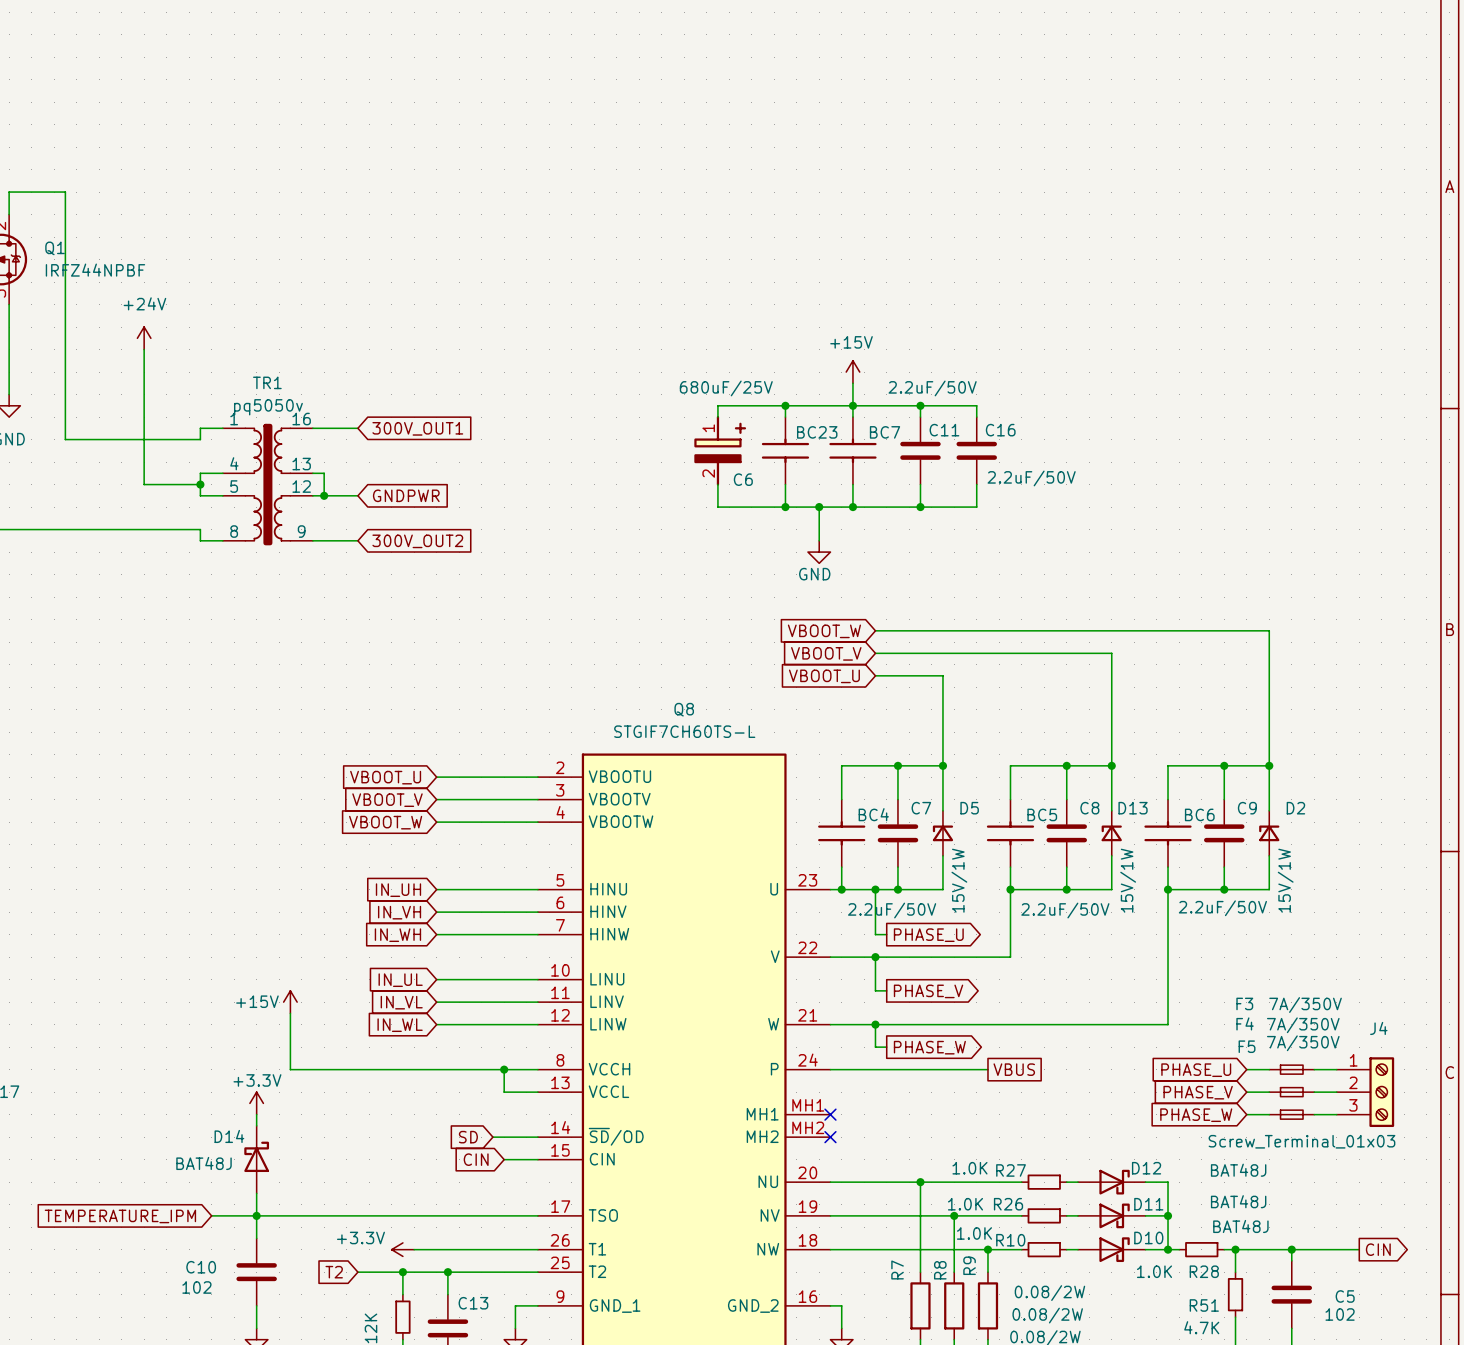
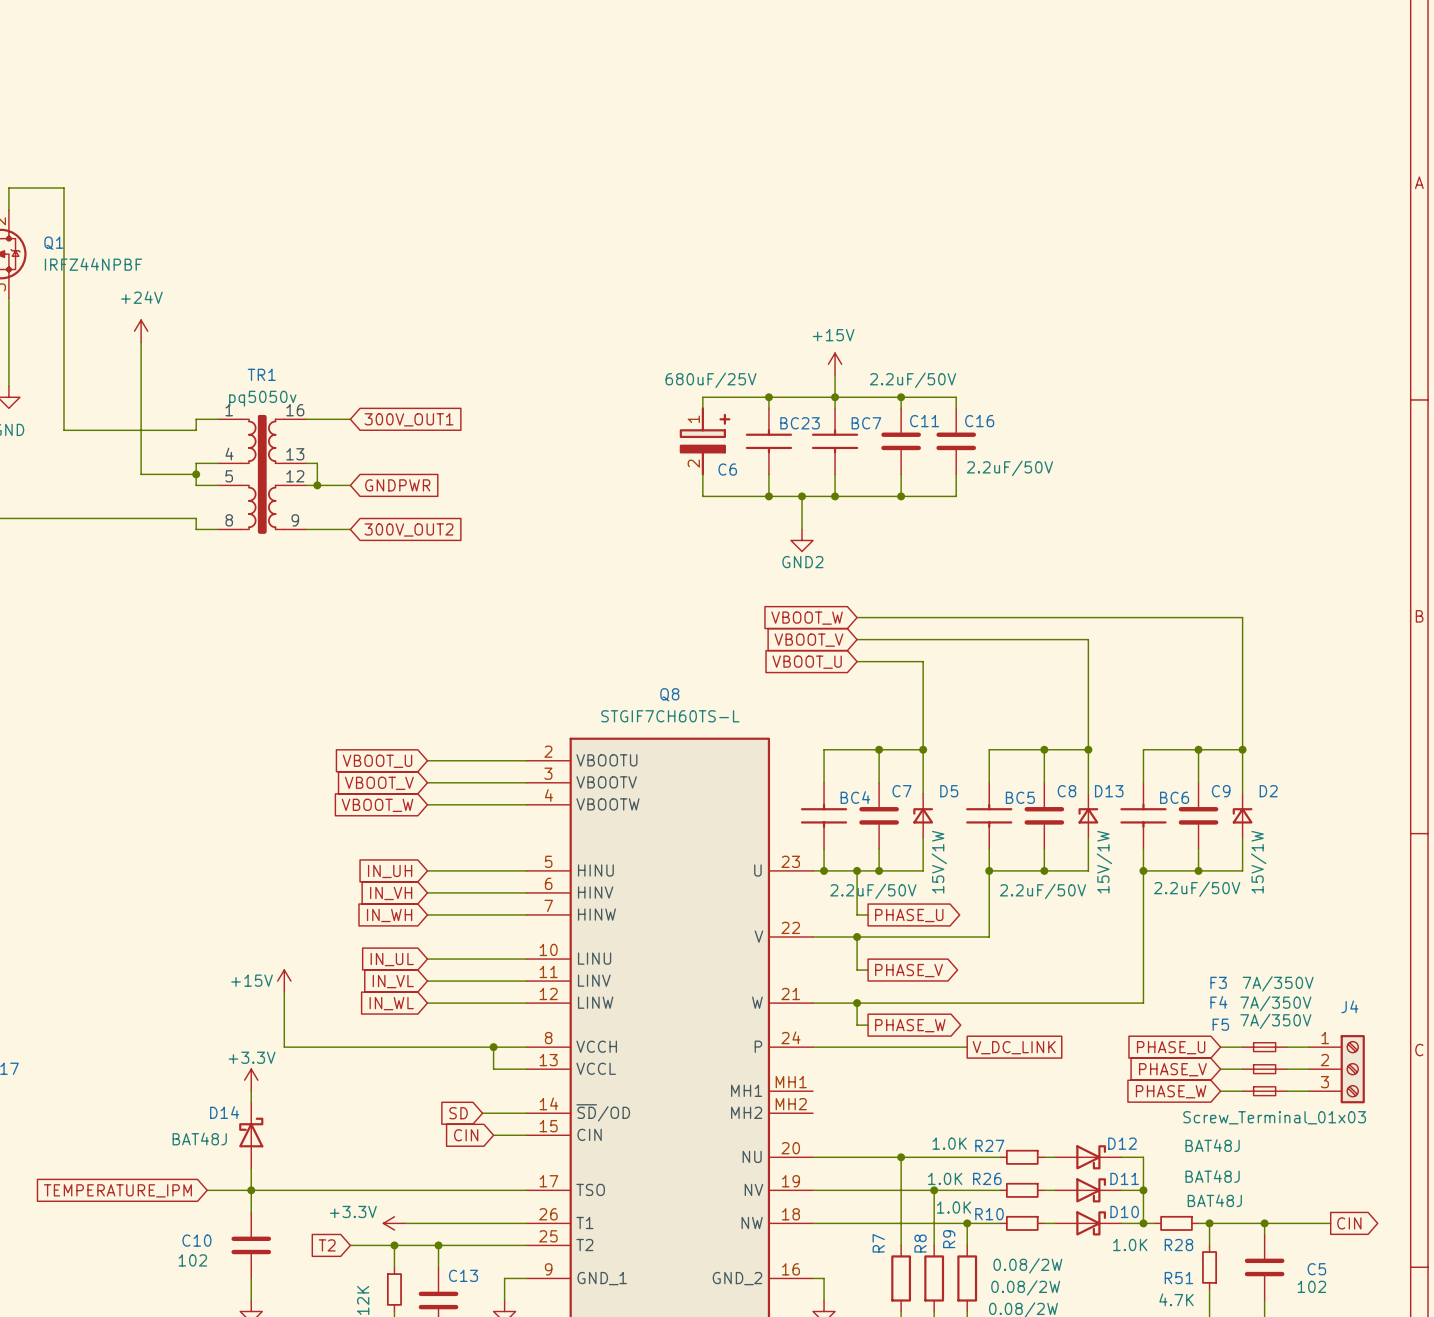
power symbol: GND (819, 552) -> GND2 (801, 540)
global label: VBUS (1014, 1069) -> V_DC_LINK (1014, 1047)
no-connect mark: (830, 1114) -> none
no-connect mark: (830, 1137) -> none

